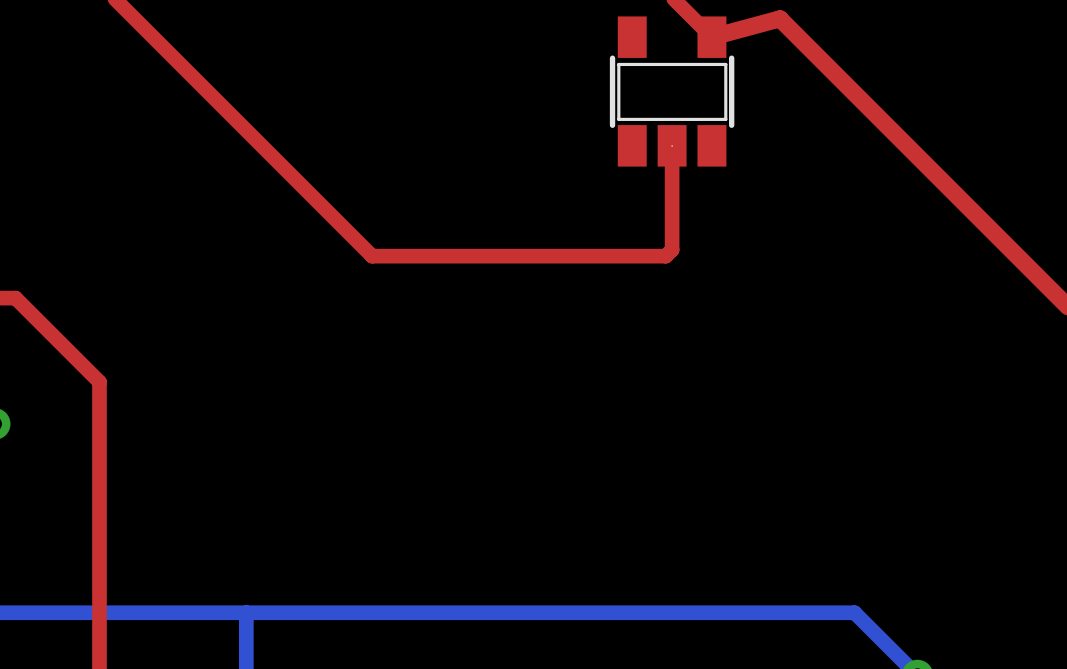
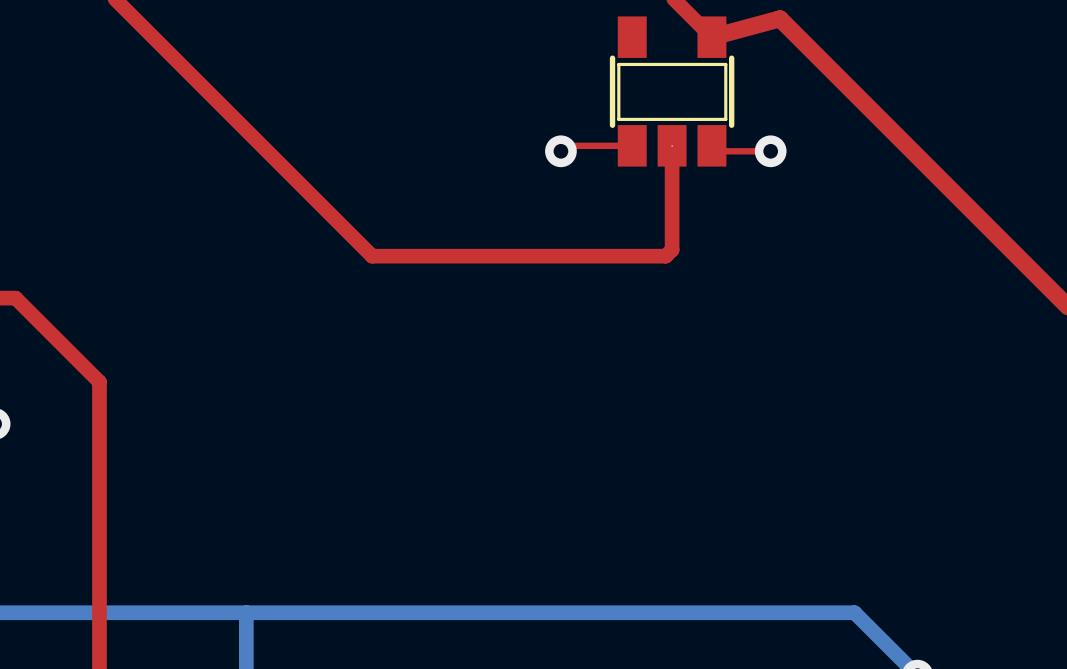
top track: none -> (632, 145) (566, 145) (560, 151)
top track: none -> (711, 145) (717, 151) (770, 151)
via: none -> (560, 151)
via: none -> (770, 151)

